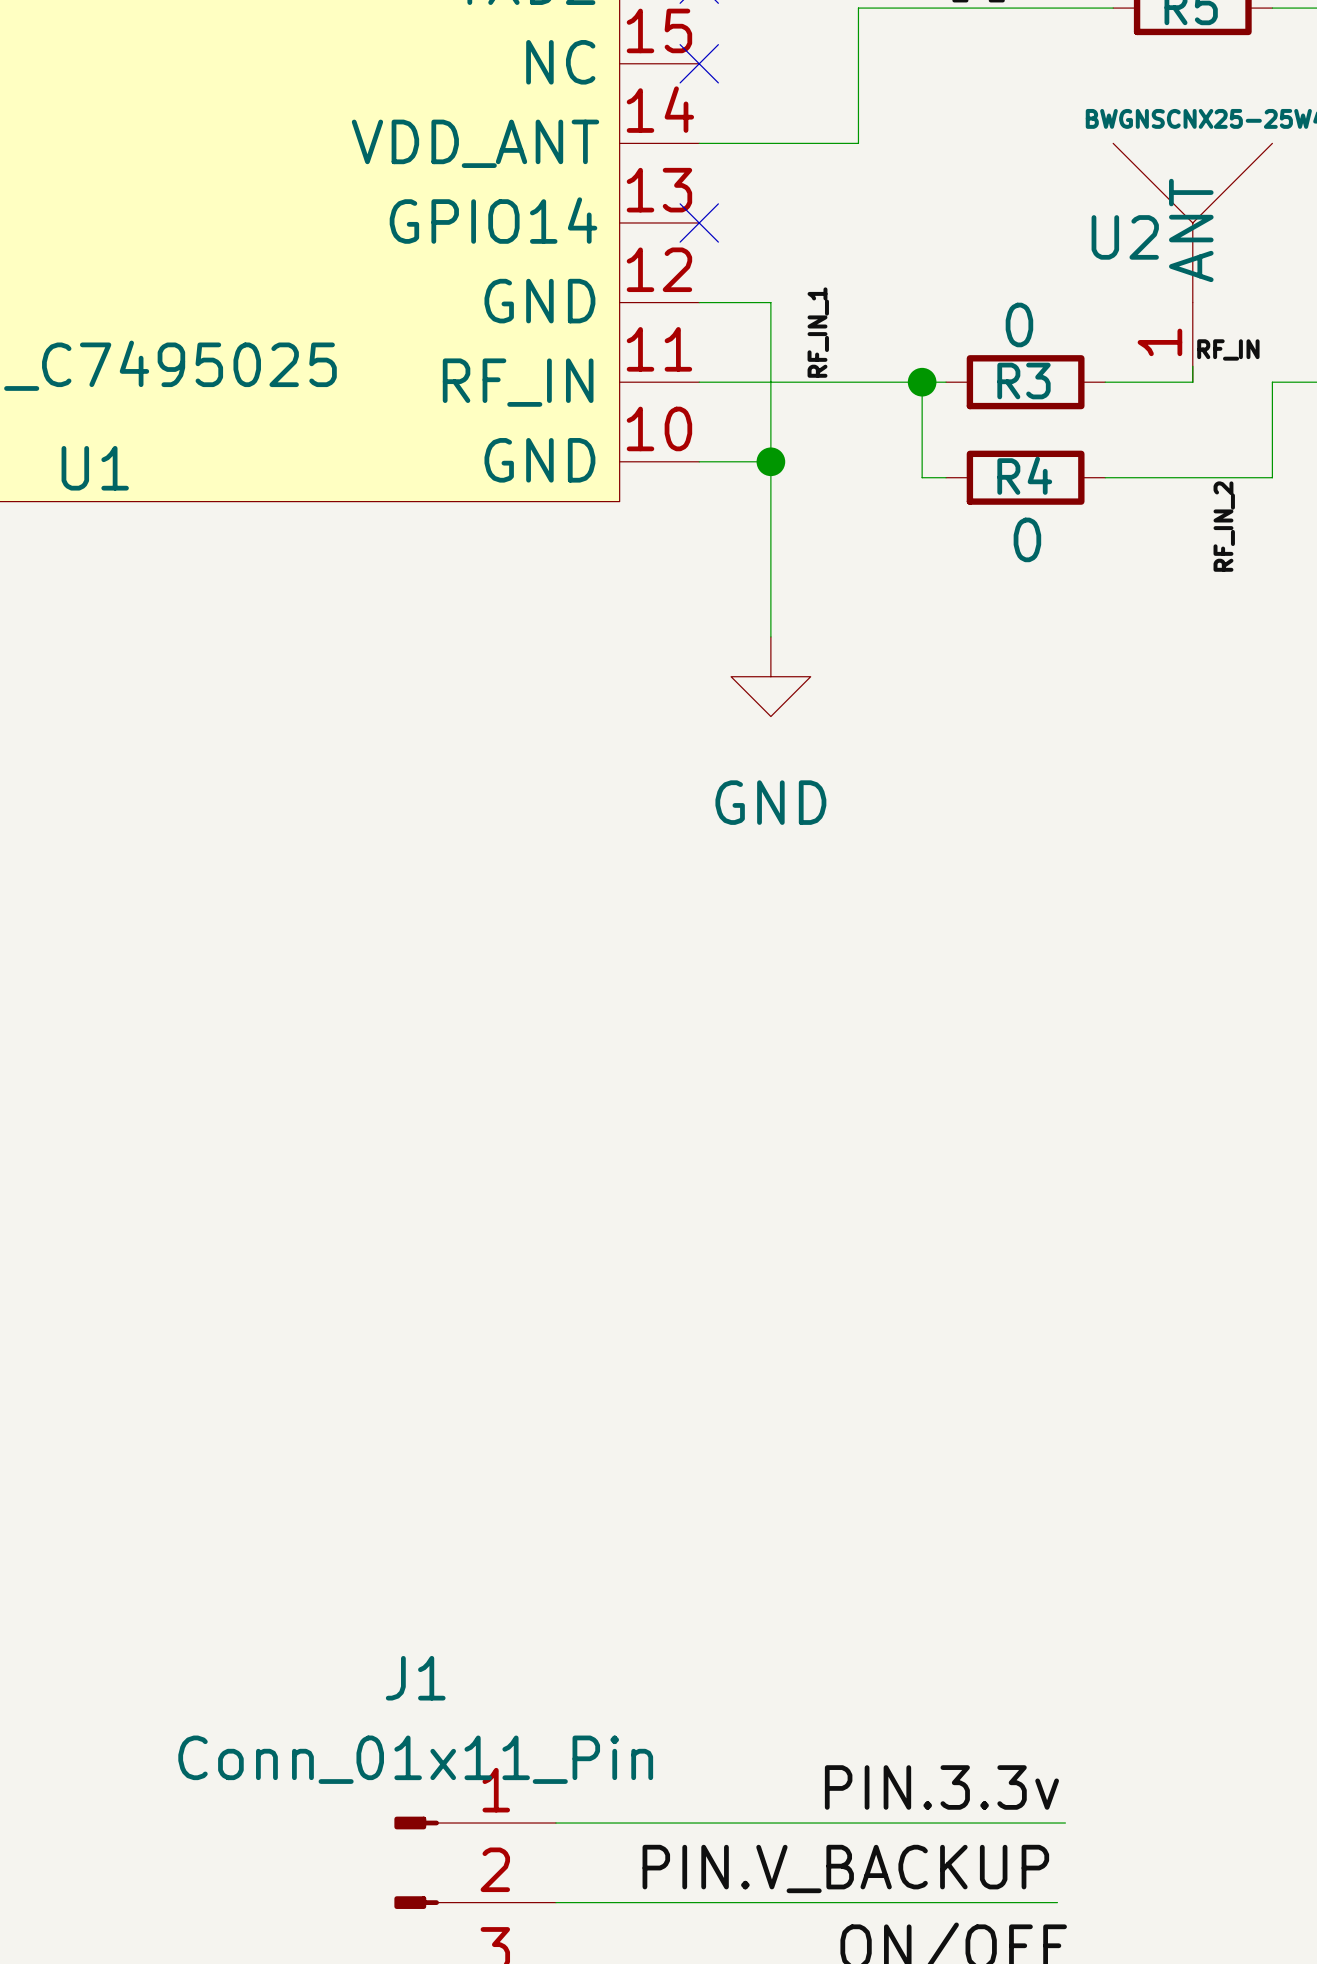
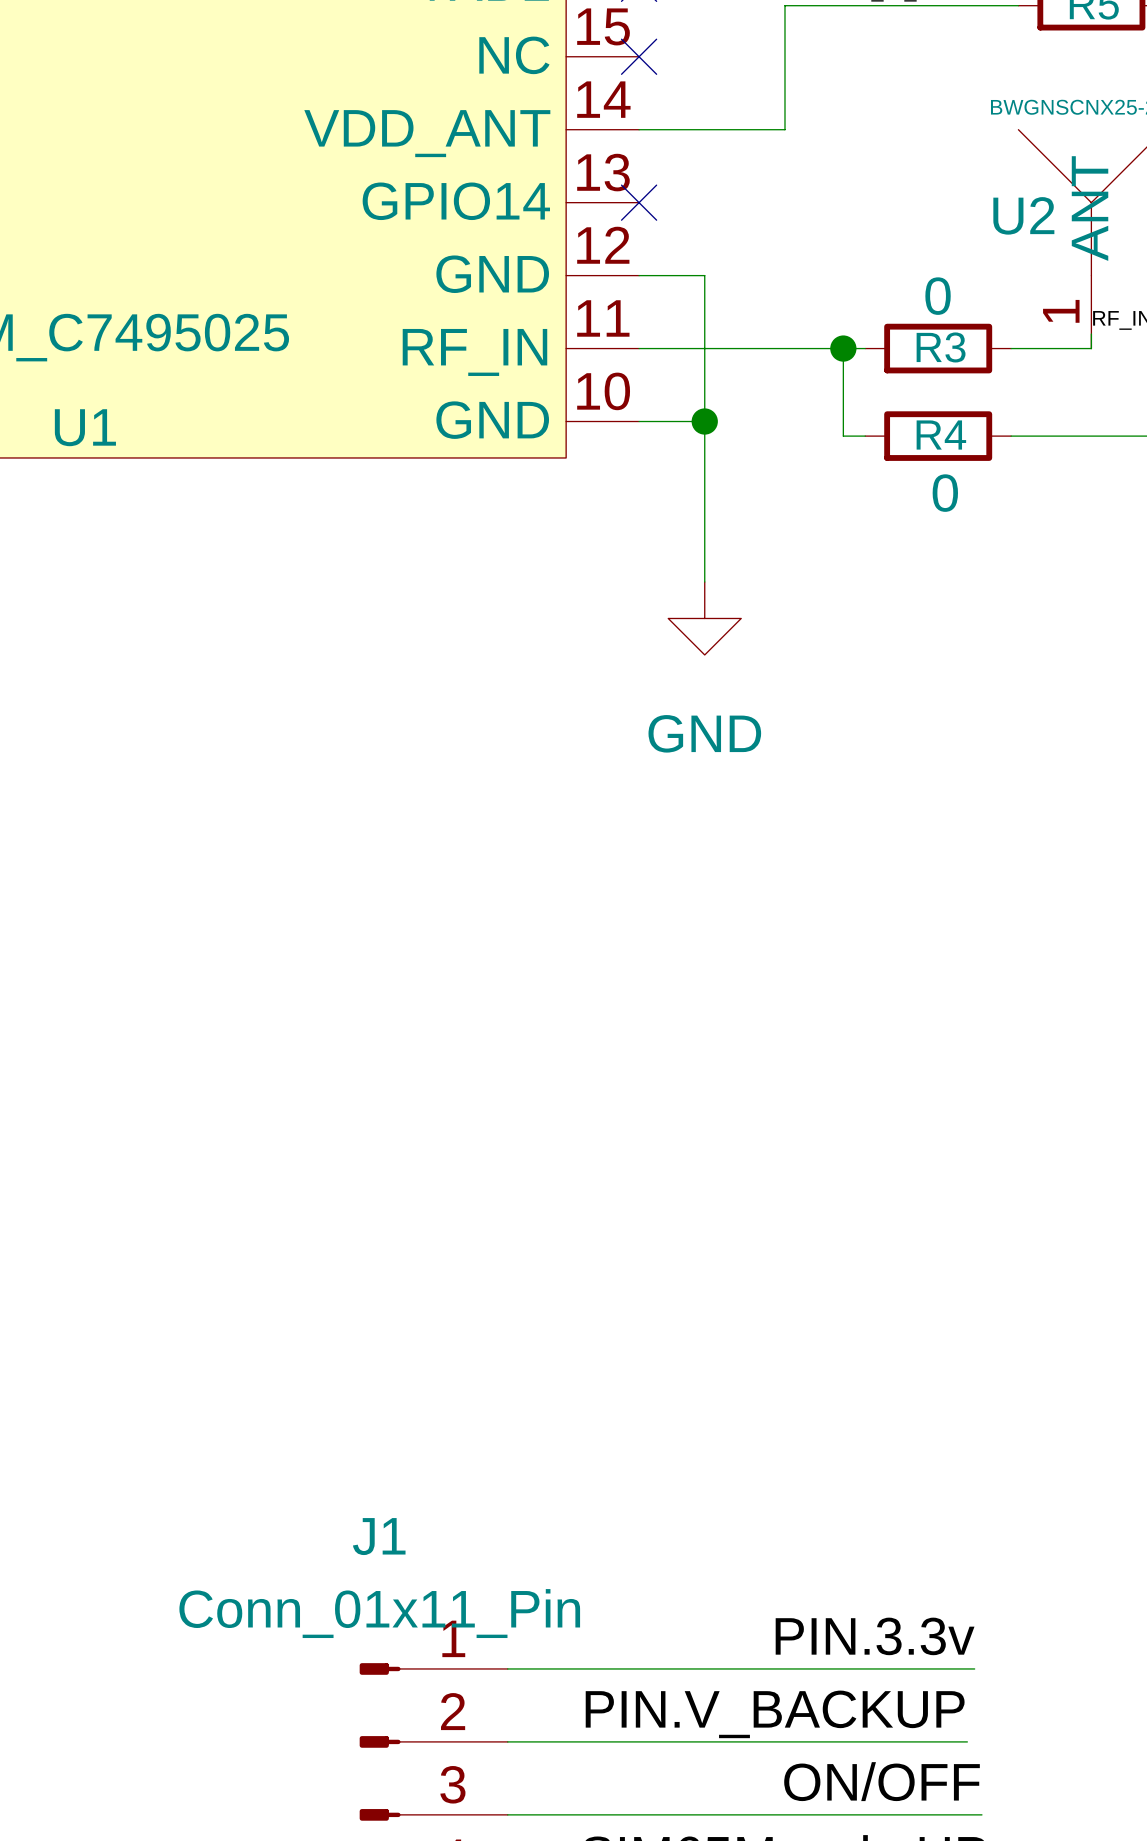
label: RF_IN_1 (818, 332) -> none
label: RF_IN_2 (1224, 526) -> none

